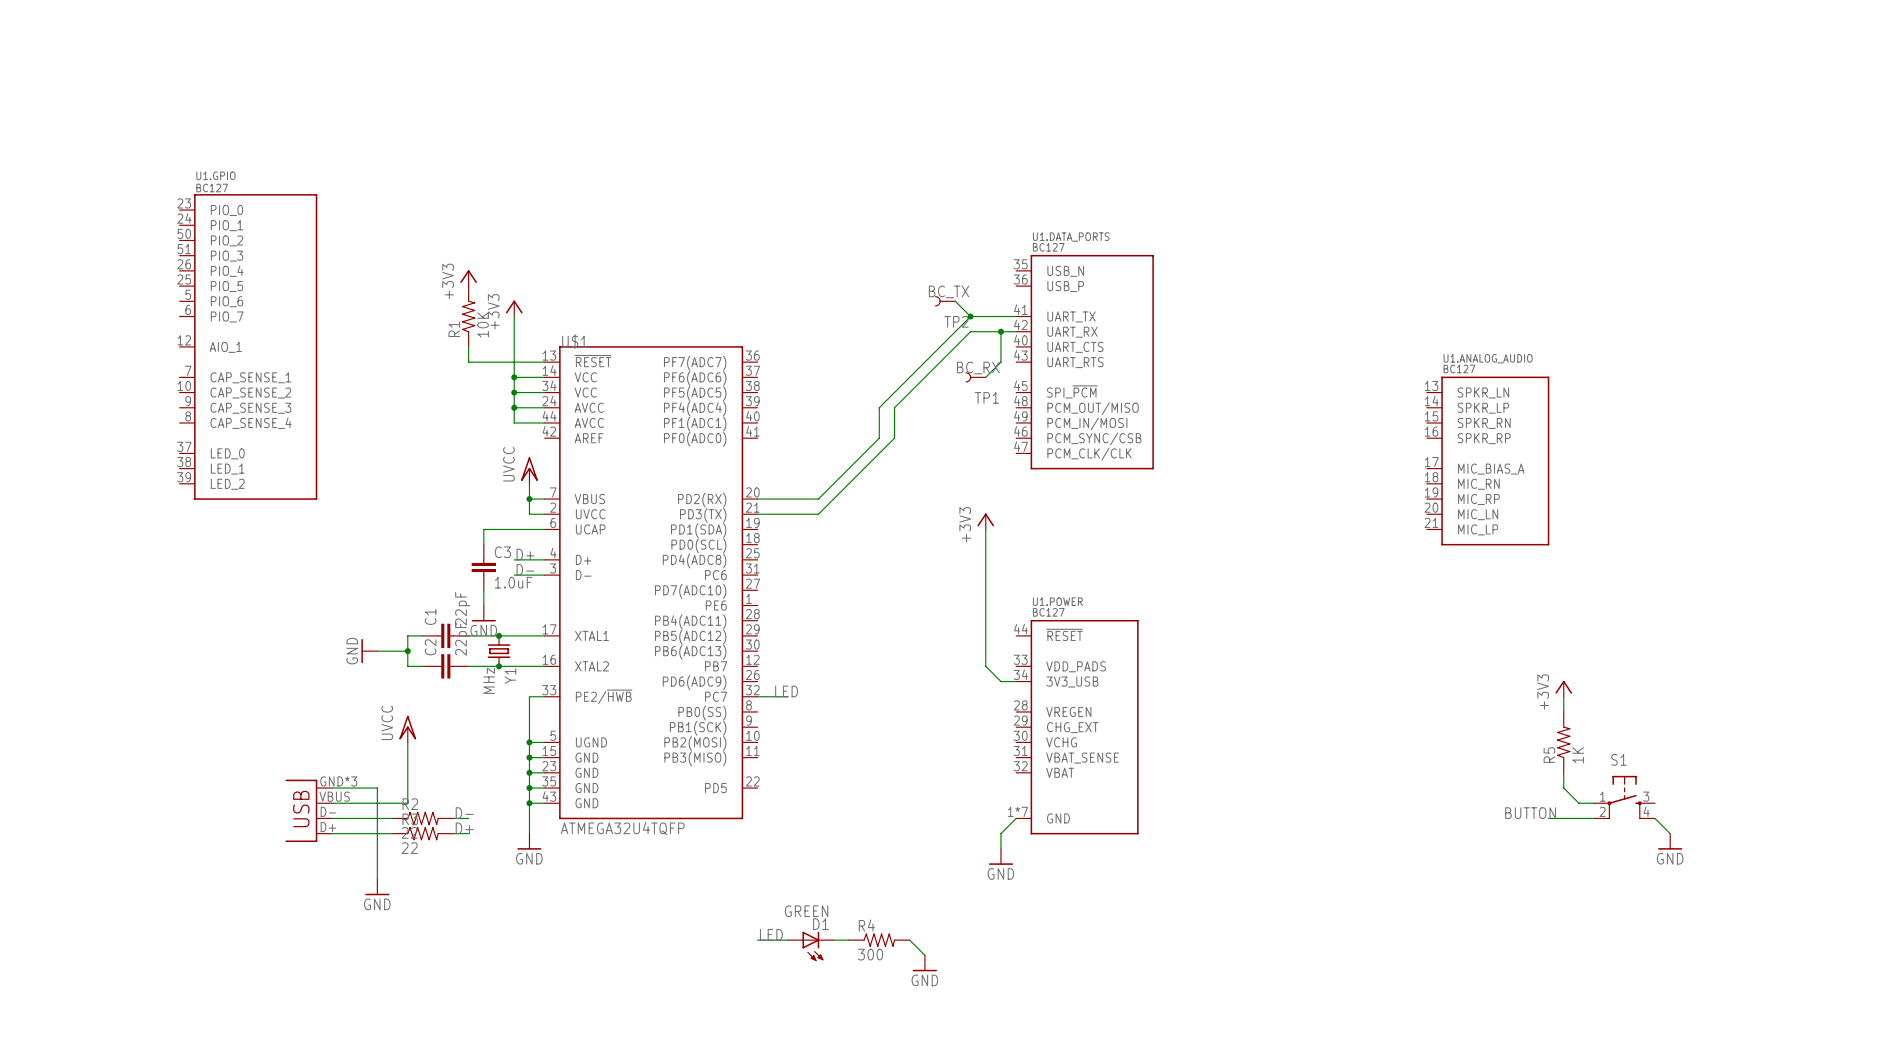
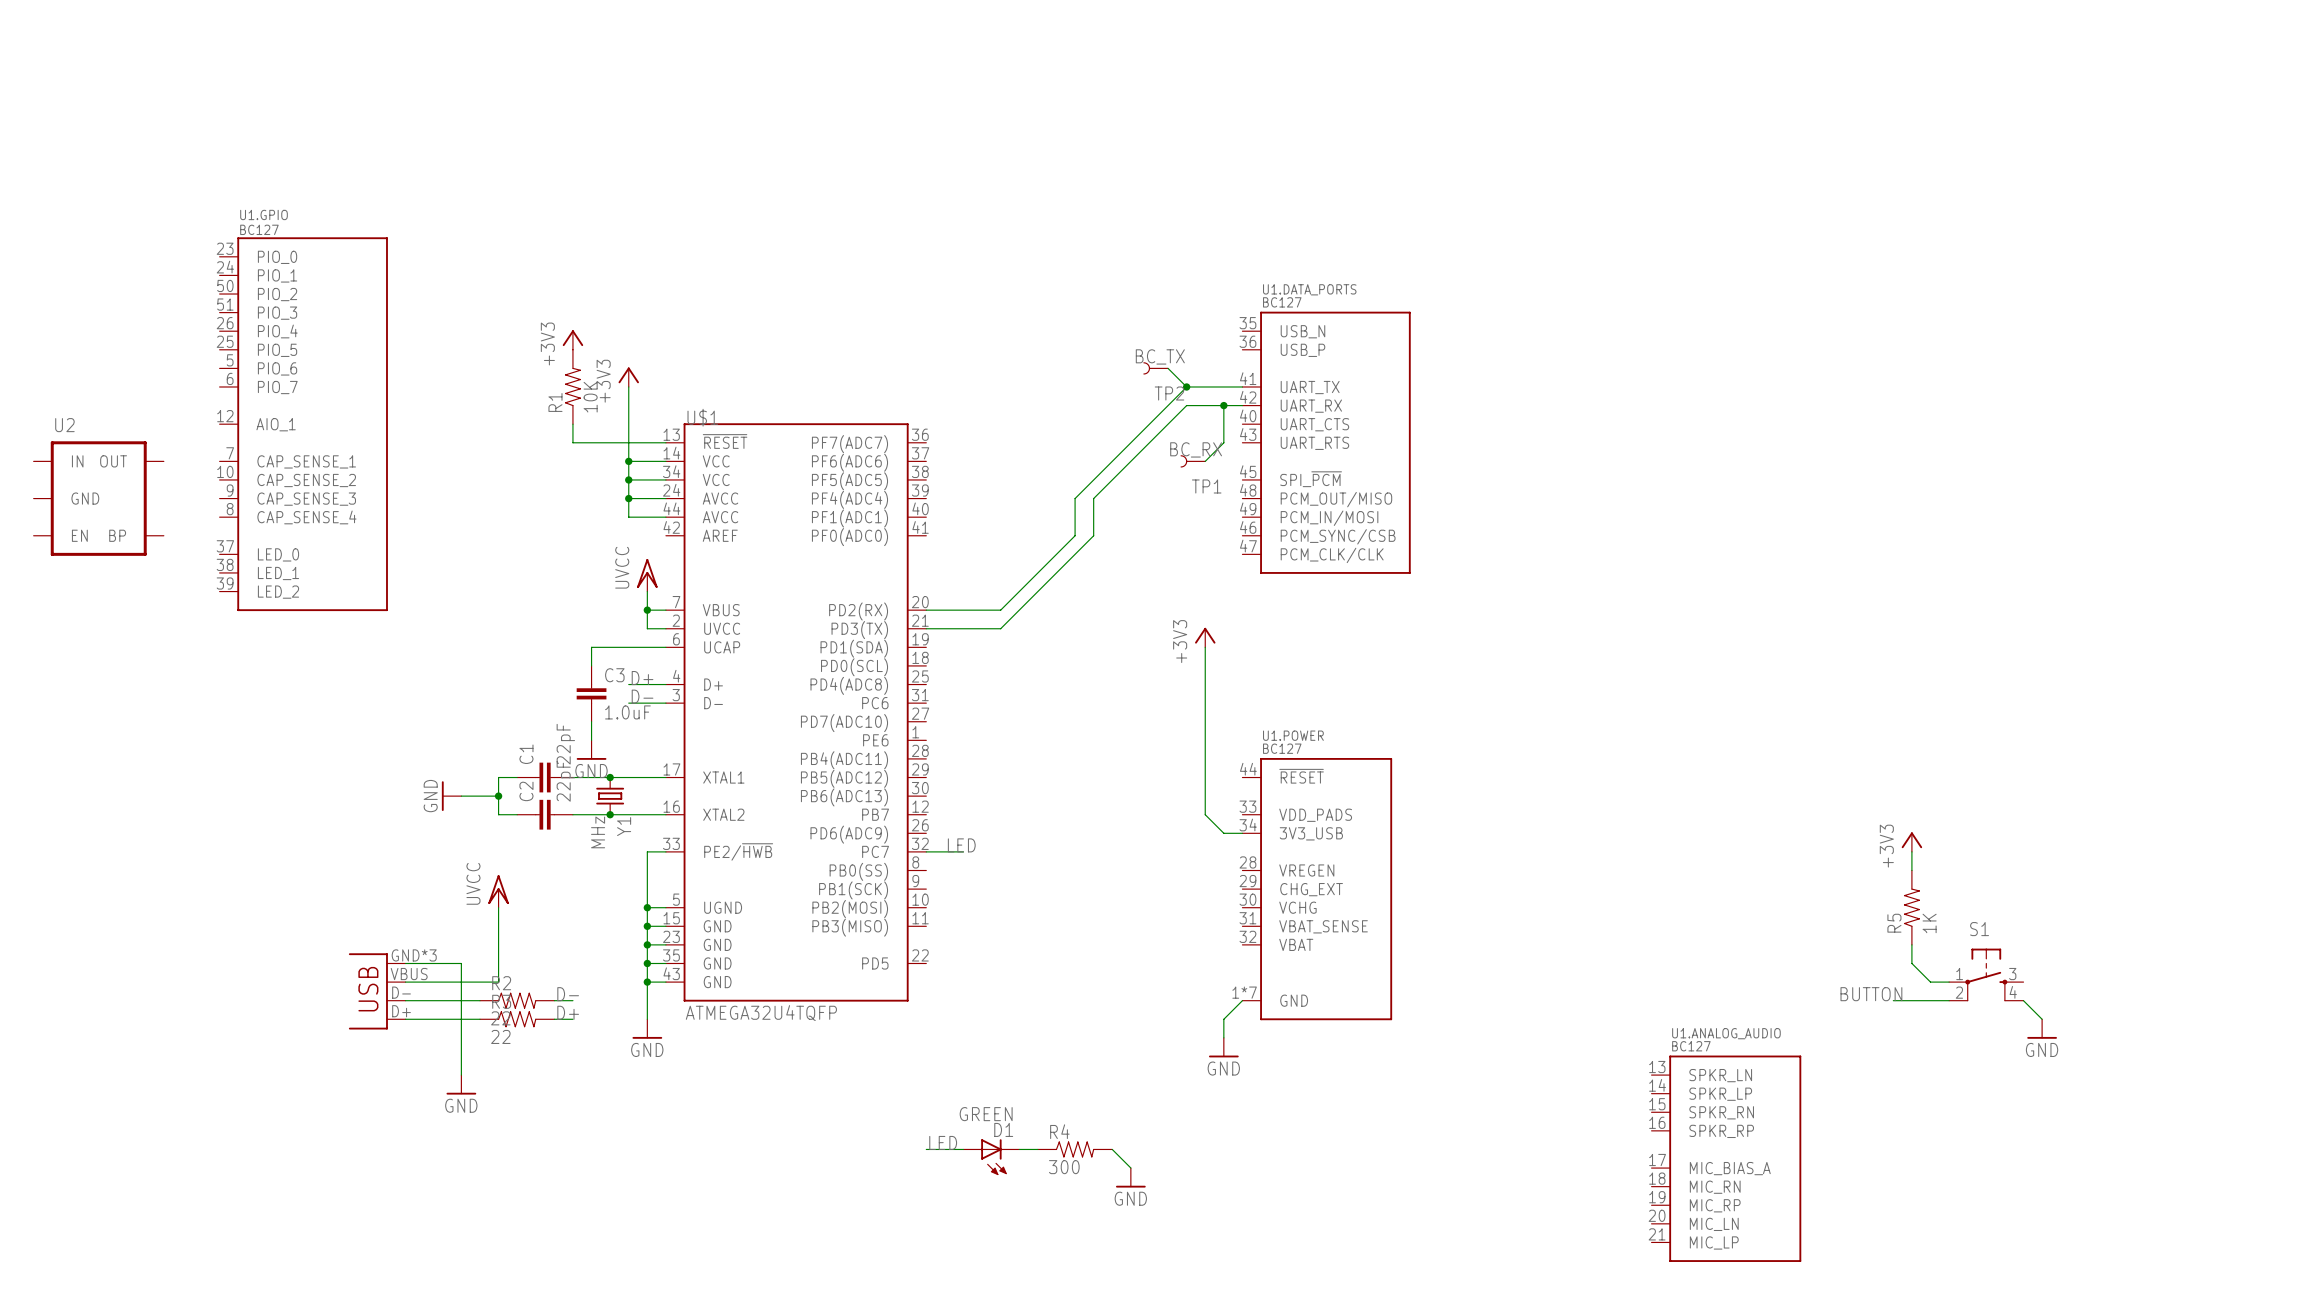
U2: none -> (98, 498)
U1.ANALOG_AUDIO position: (1488, 461) -> (1726, 1158)

